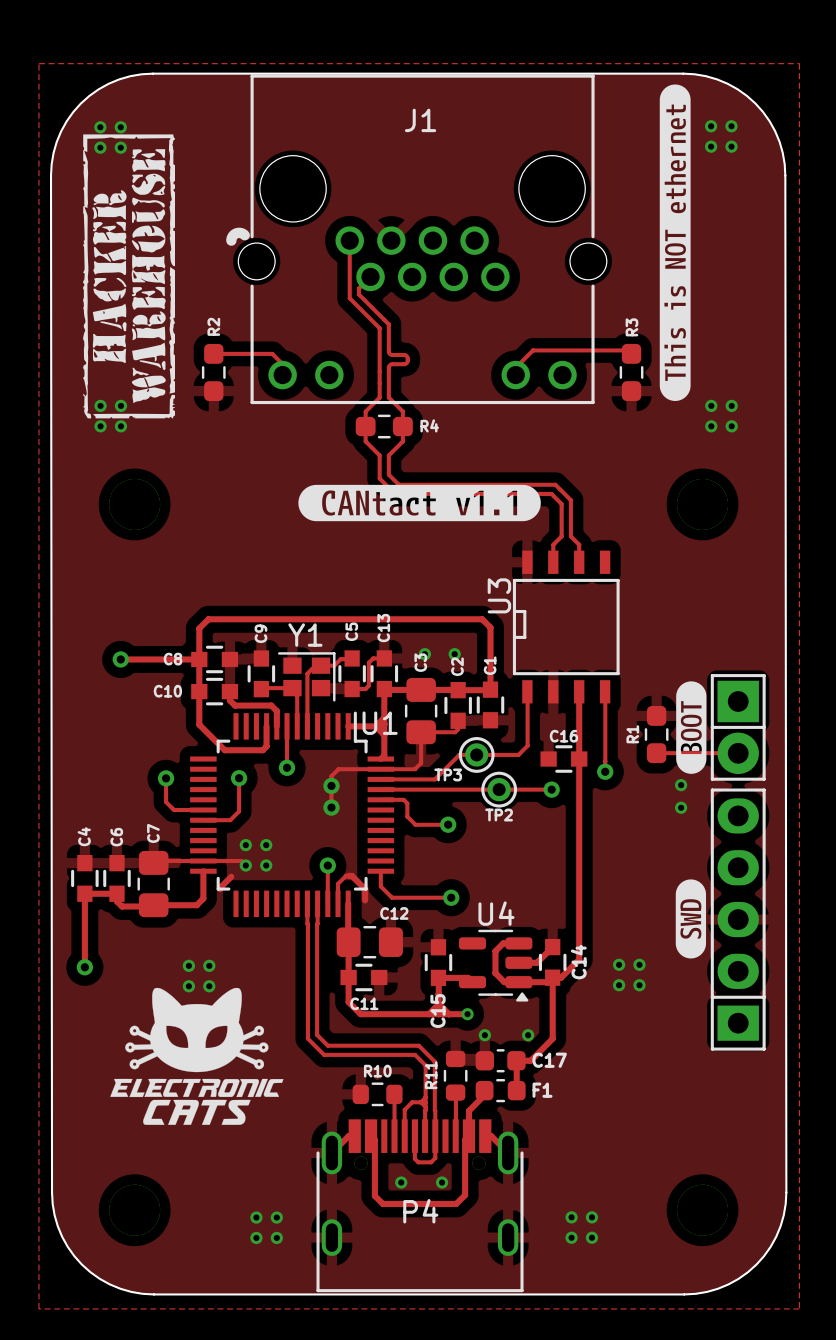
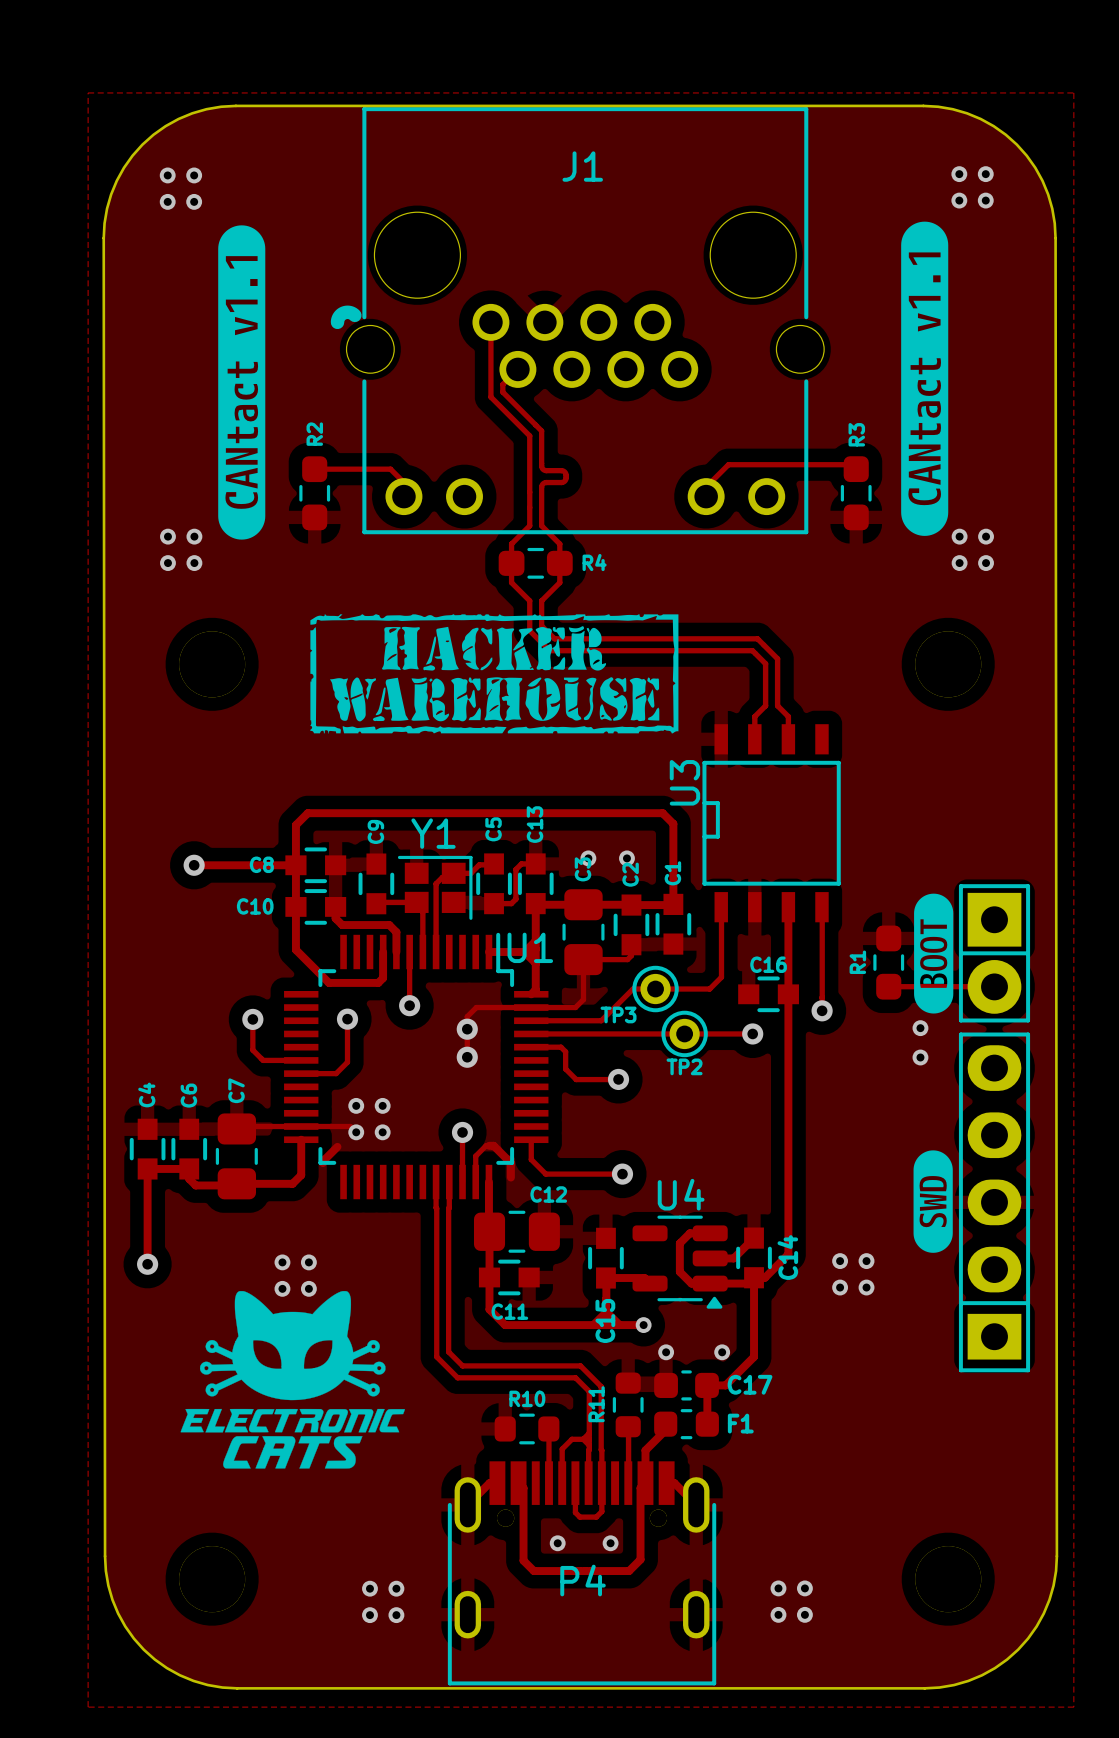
drawing: [659, 84, 691, 401] -> none
drawing: [83, 134, 175, 419] -> none
drawing: none -> [901, 221, 949, 536]
drawing shape: [155, 286, 165, 297] -> [218, 225, 266, 540]
drawing: none -> [310, 614, 679, 734]
drawing: [298, 484, 541, 522] -> none

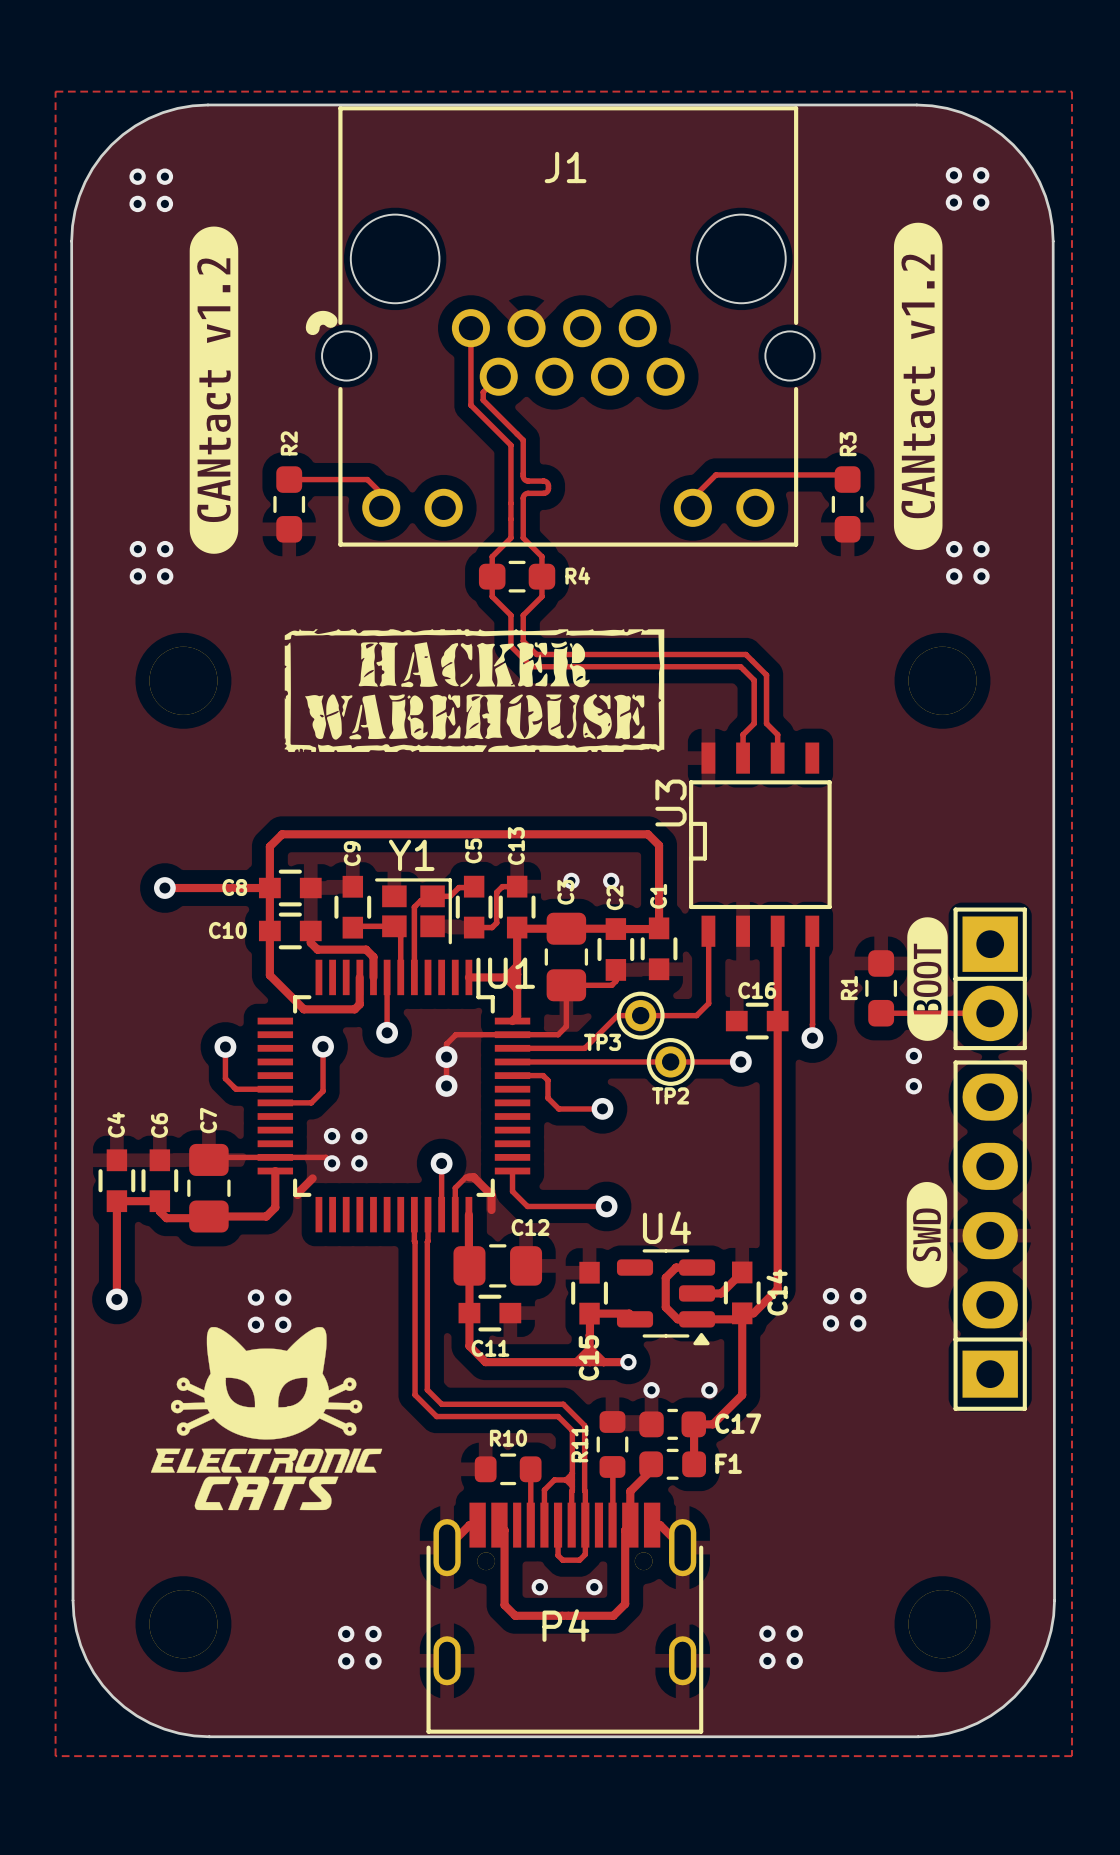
drawing shape: [901, 221, 949, 536] -> [893, 222, 943, 550]
drawing shape: [218, 225, 266, 540] -> [189, 226, 239, 554]

